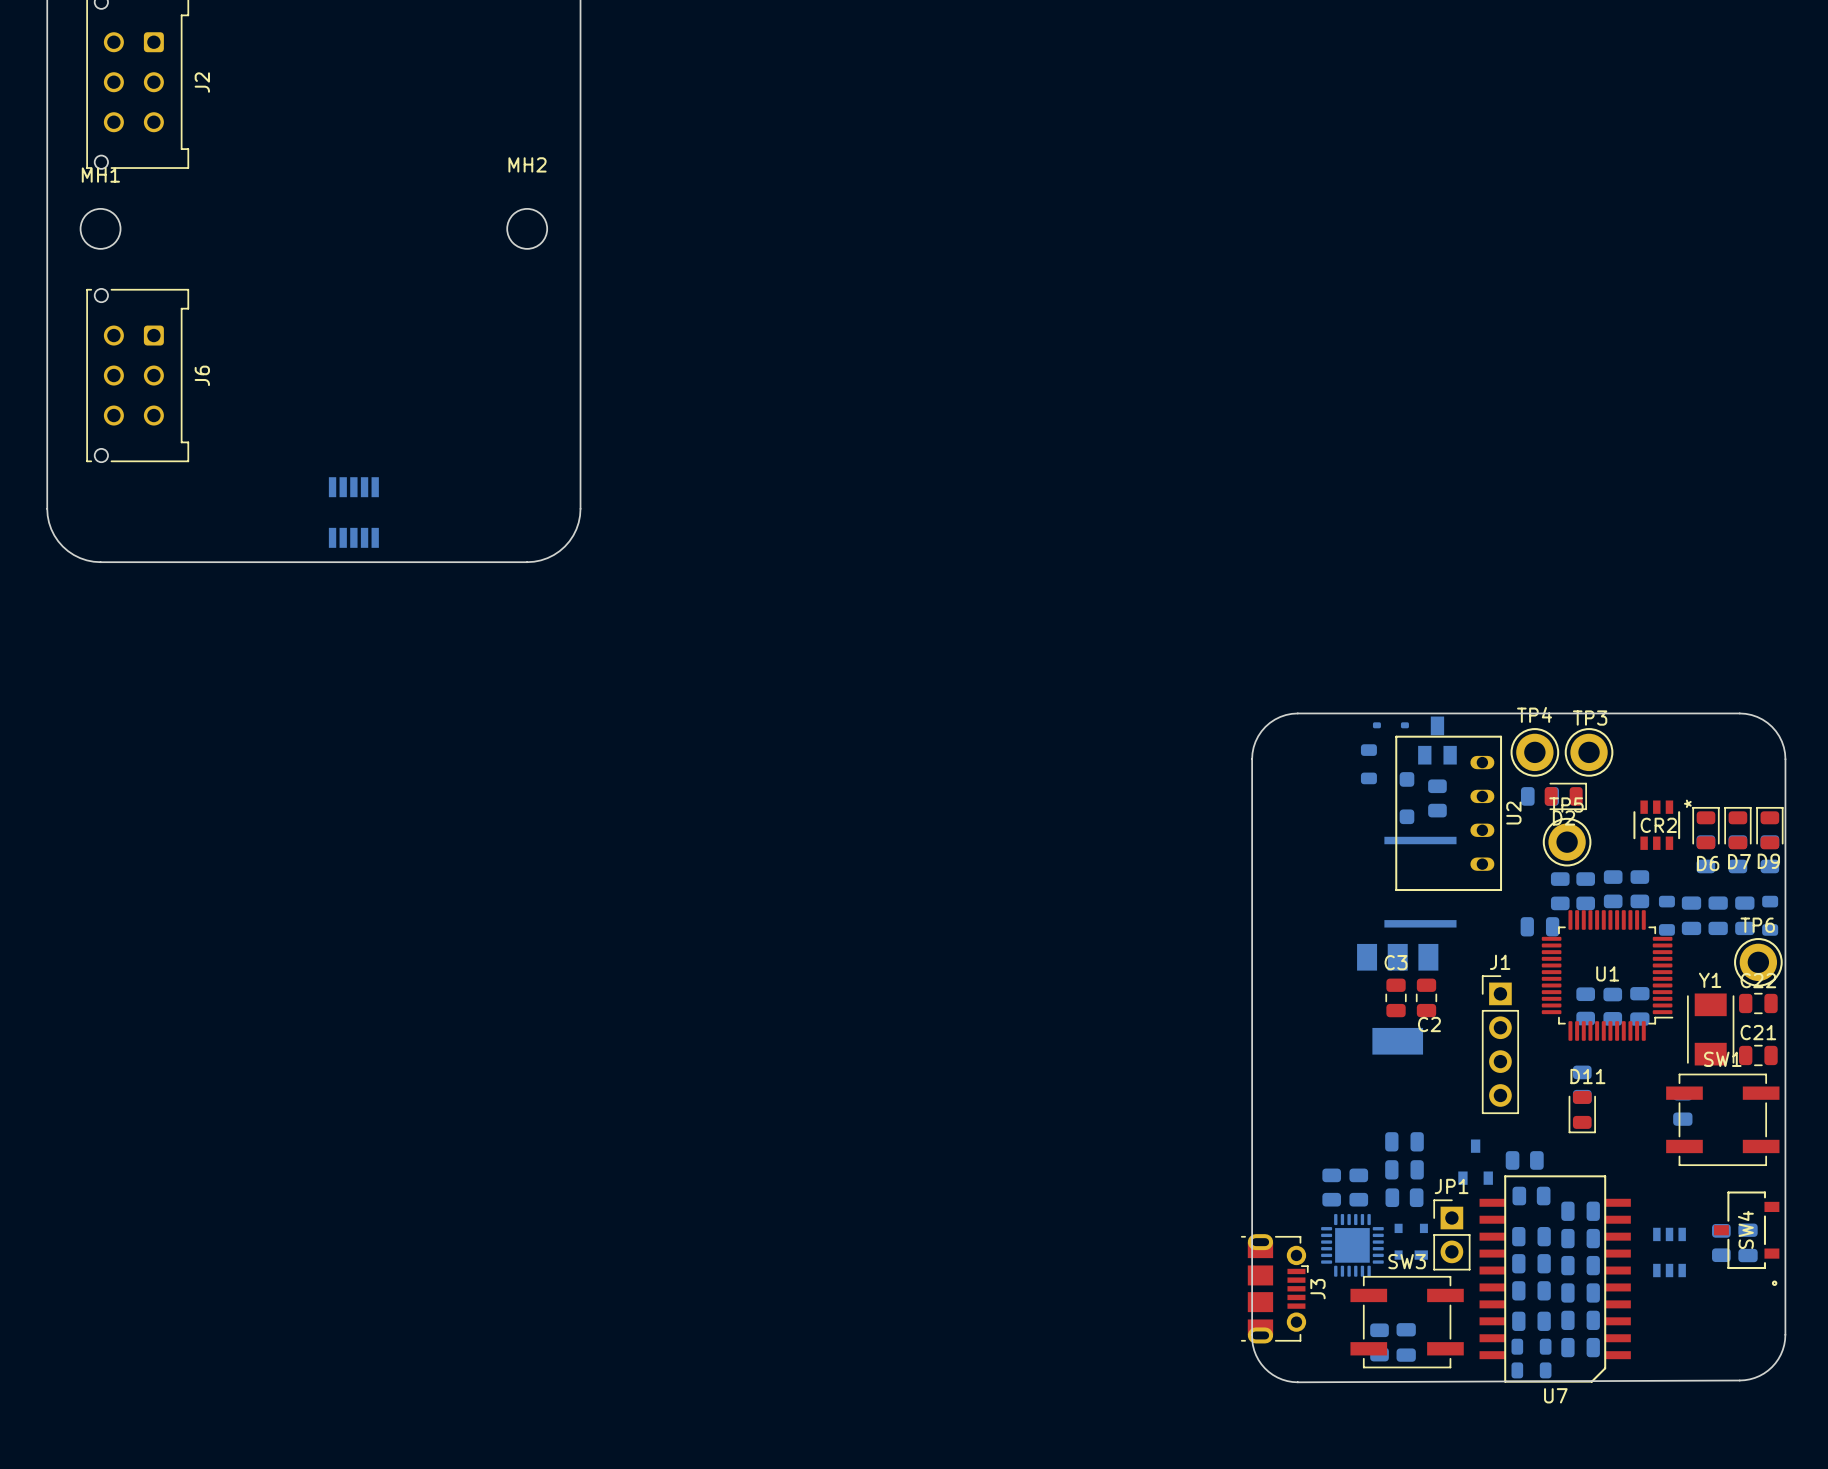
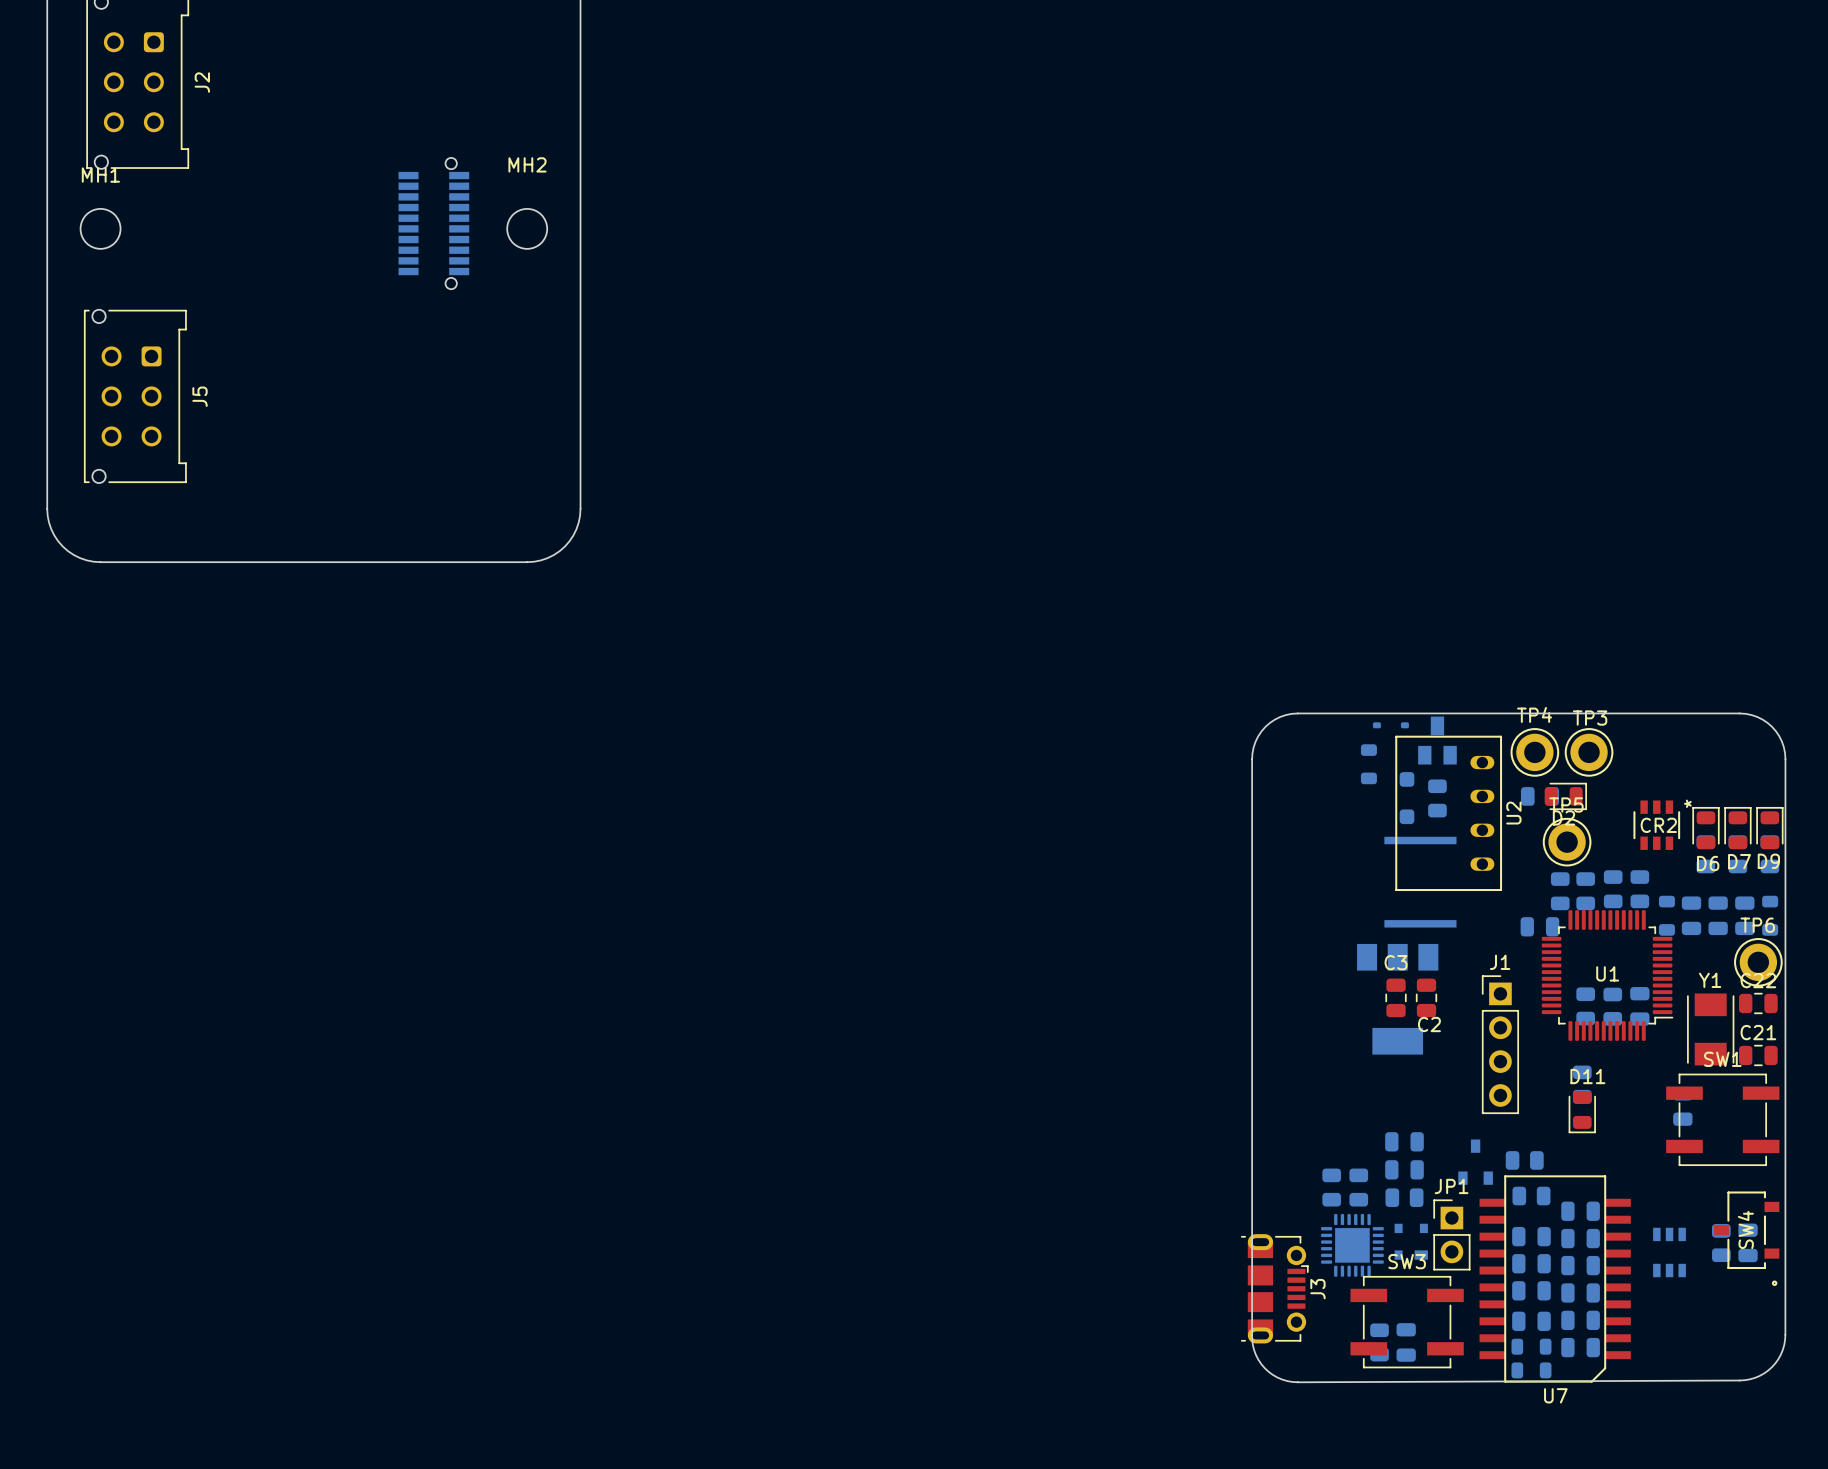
part: none -> (433, 223)
J6: (137, 375) -> none
J5: none -> (135, 396)
part: (353, 512) -> none

